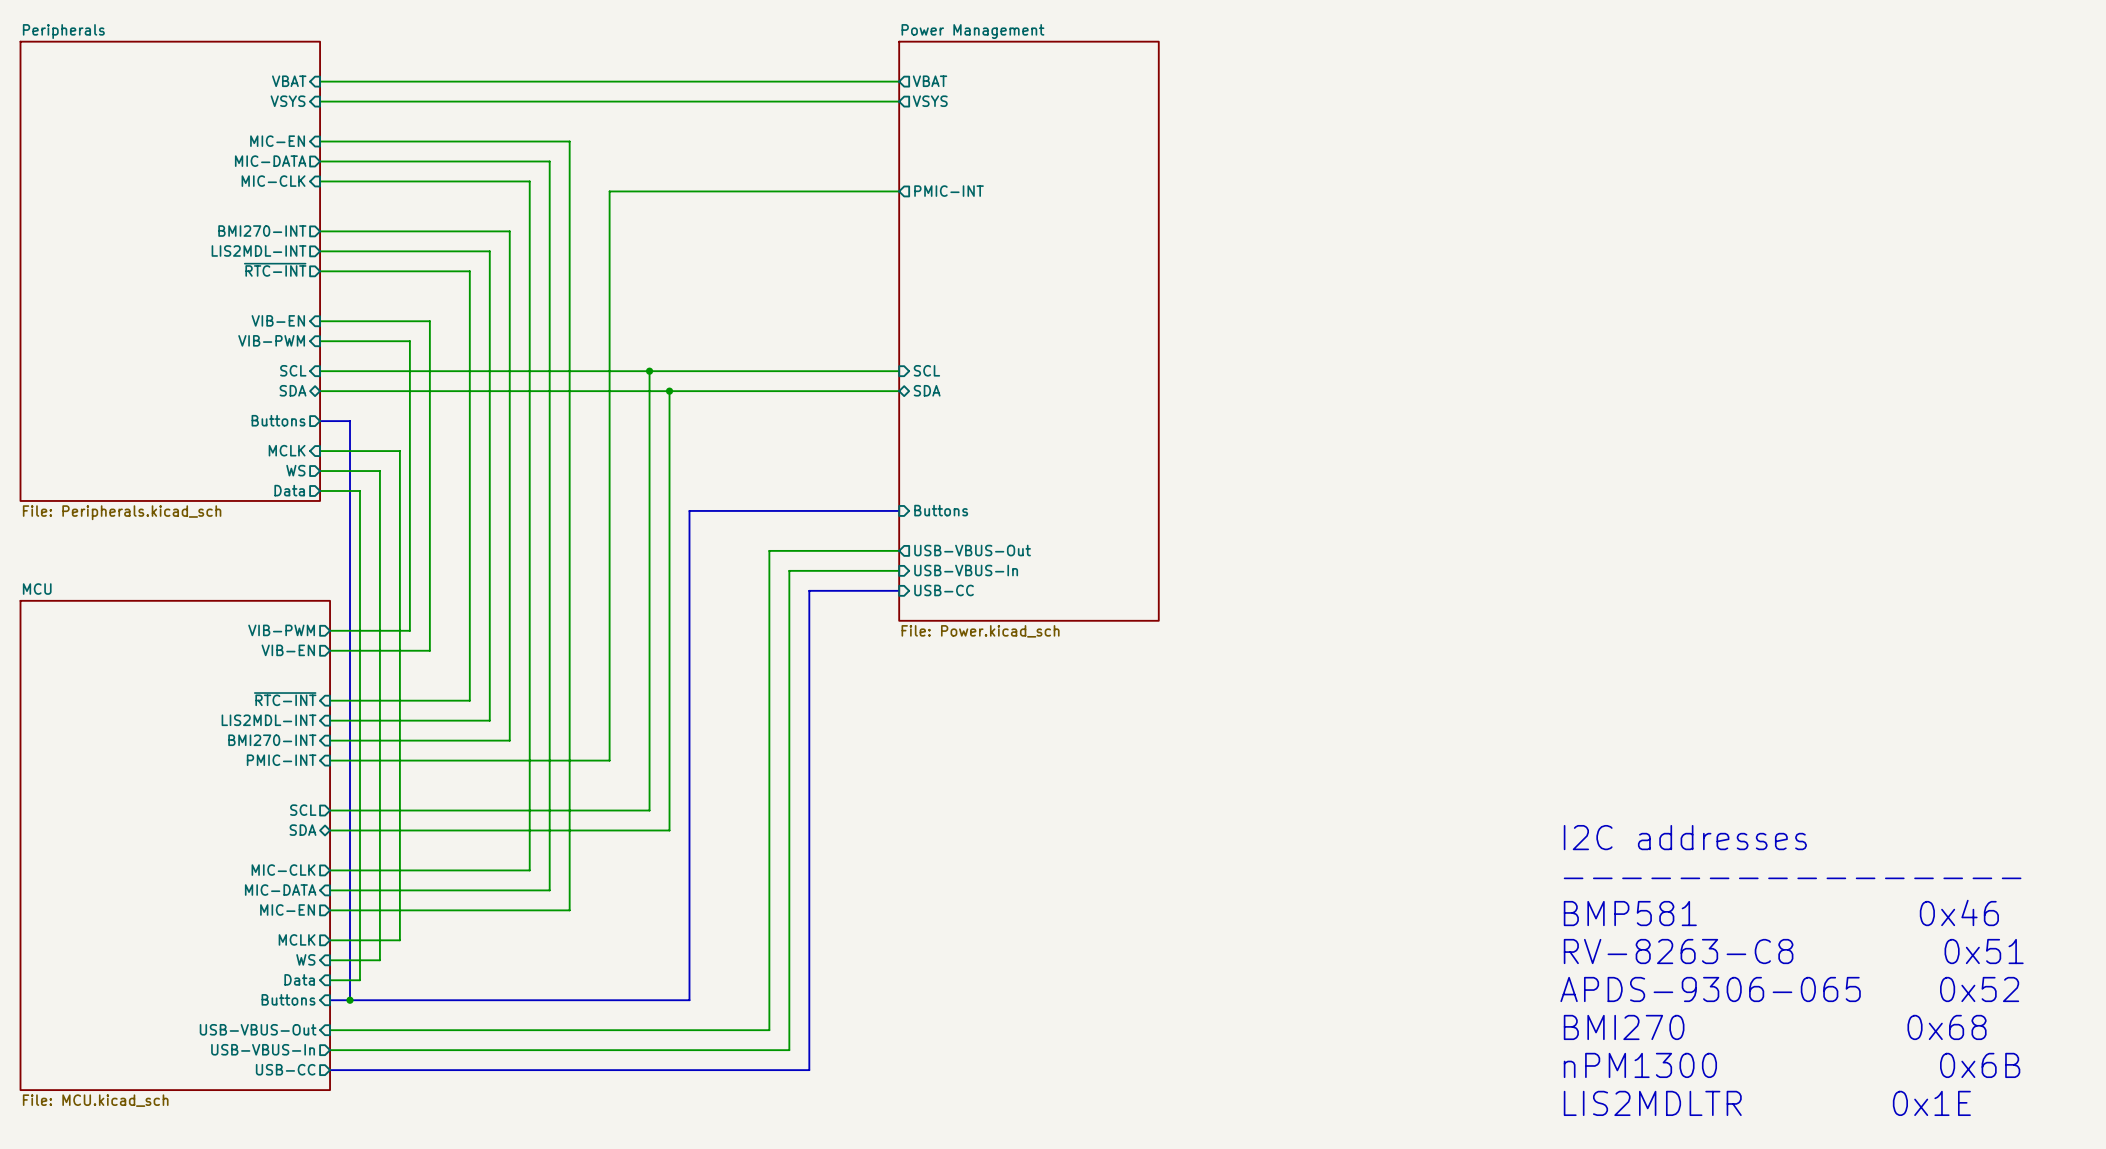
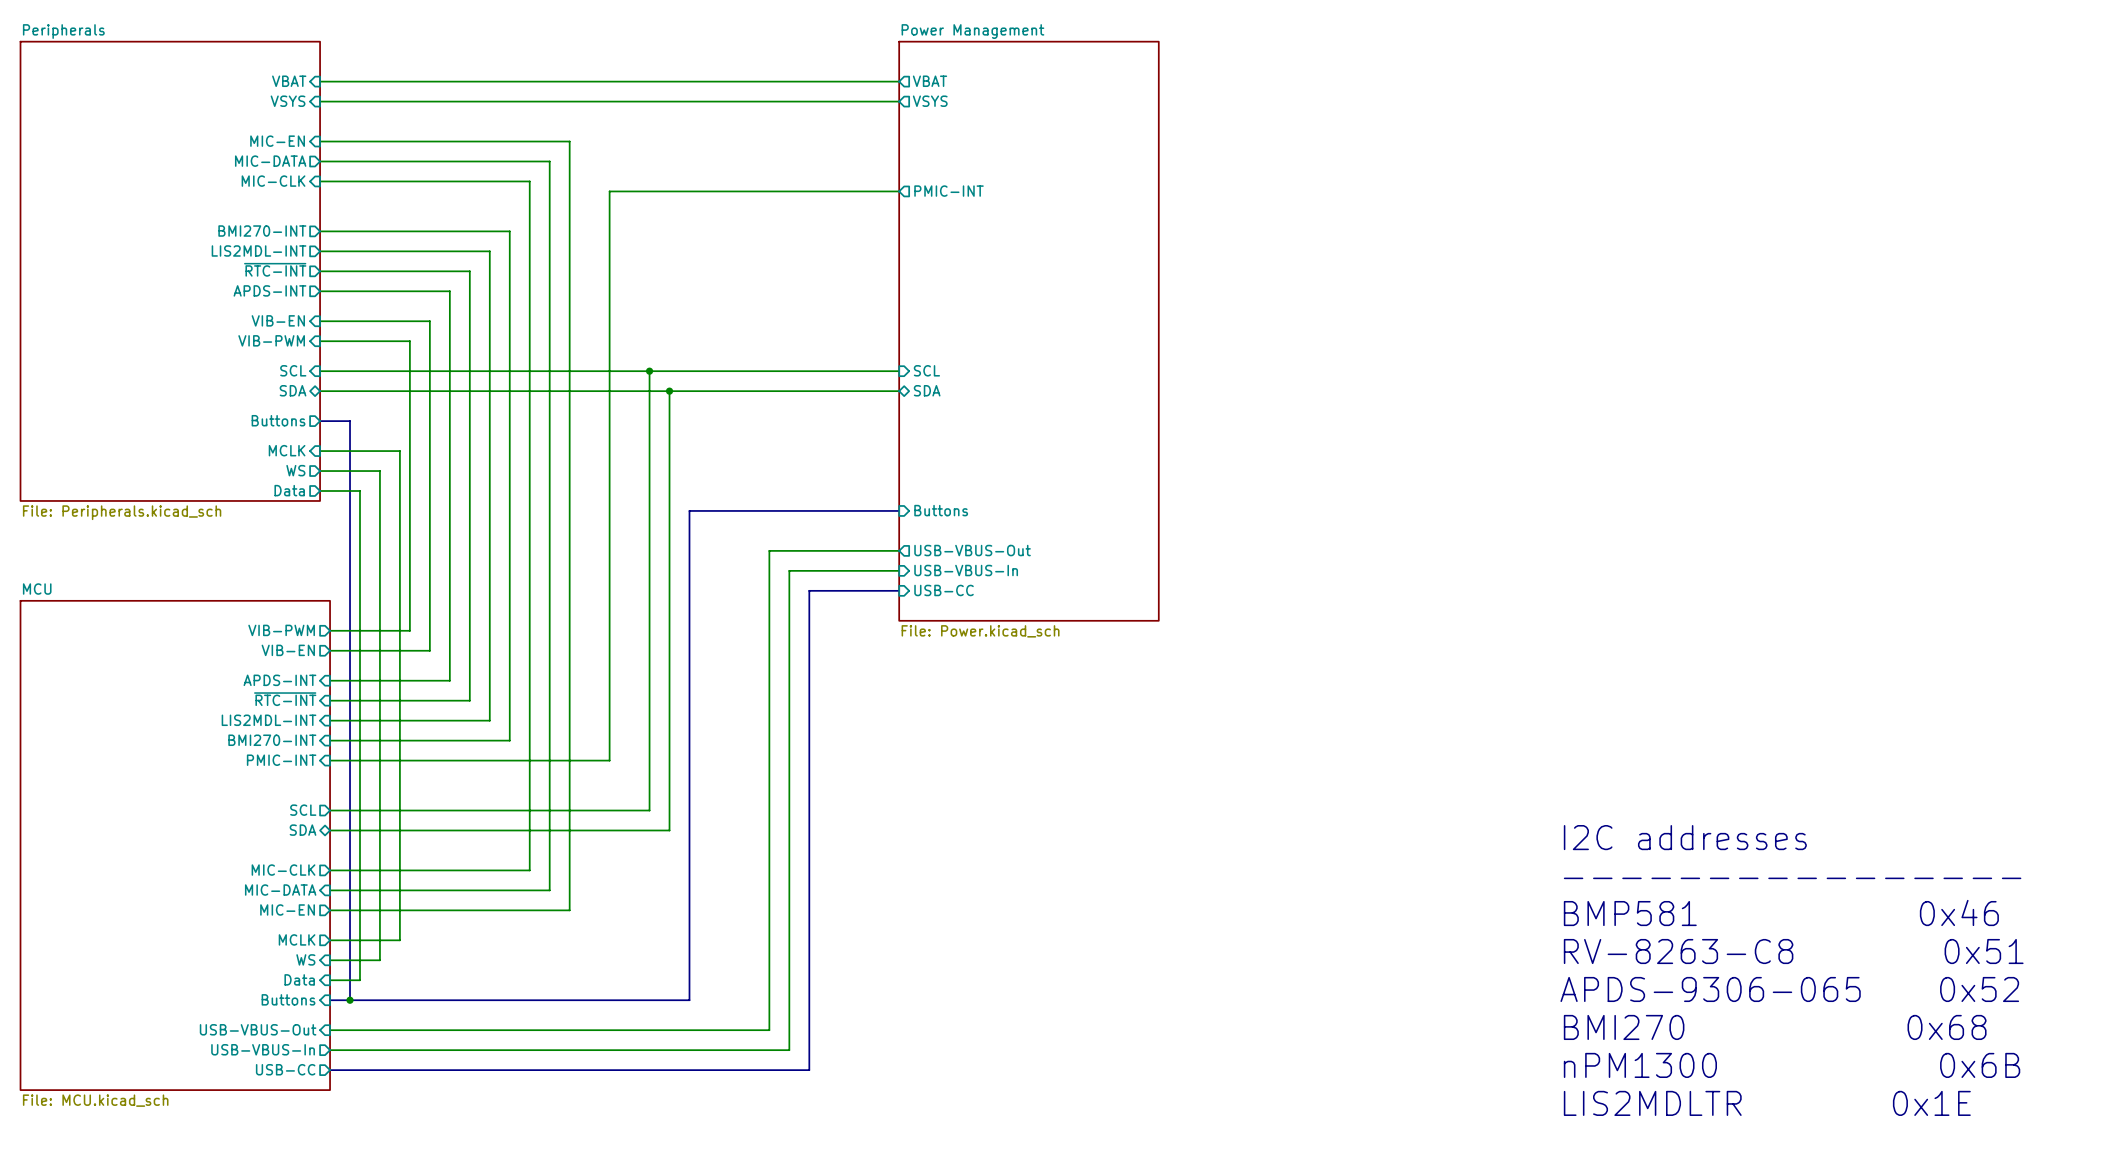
sheet pin: none -> APDS-INT (269, 290)
wire: none -> (320, 291) (449, 291) (449, 680) (330, 680)
sheet pin: none -> APDS-INT (279, 680)

